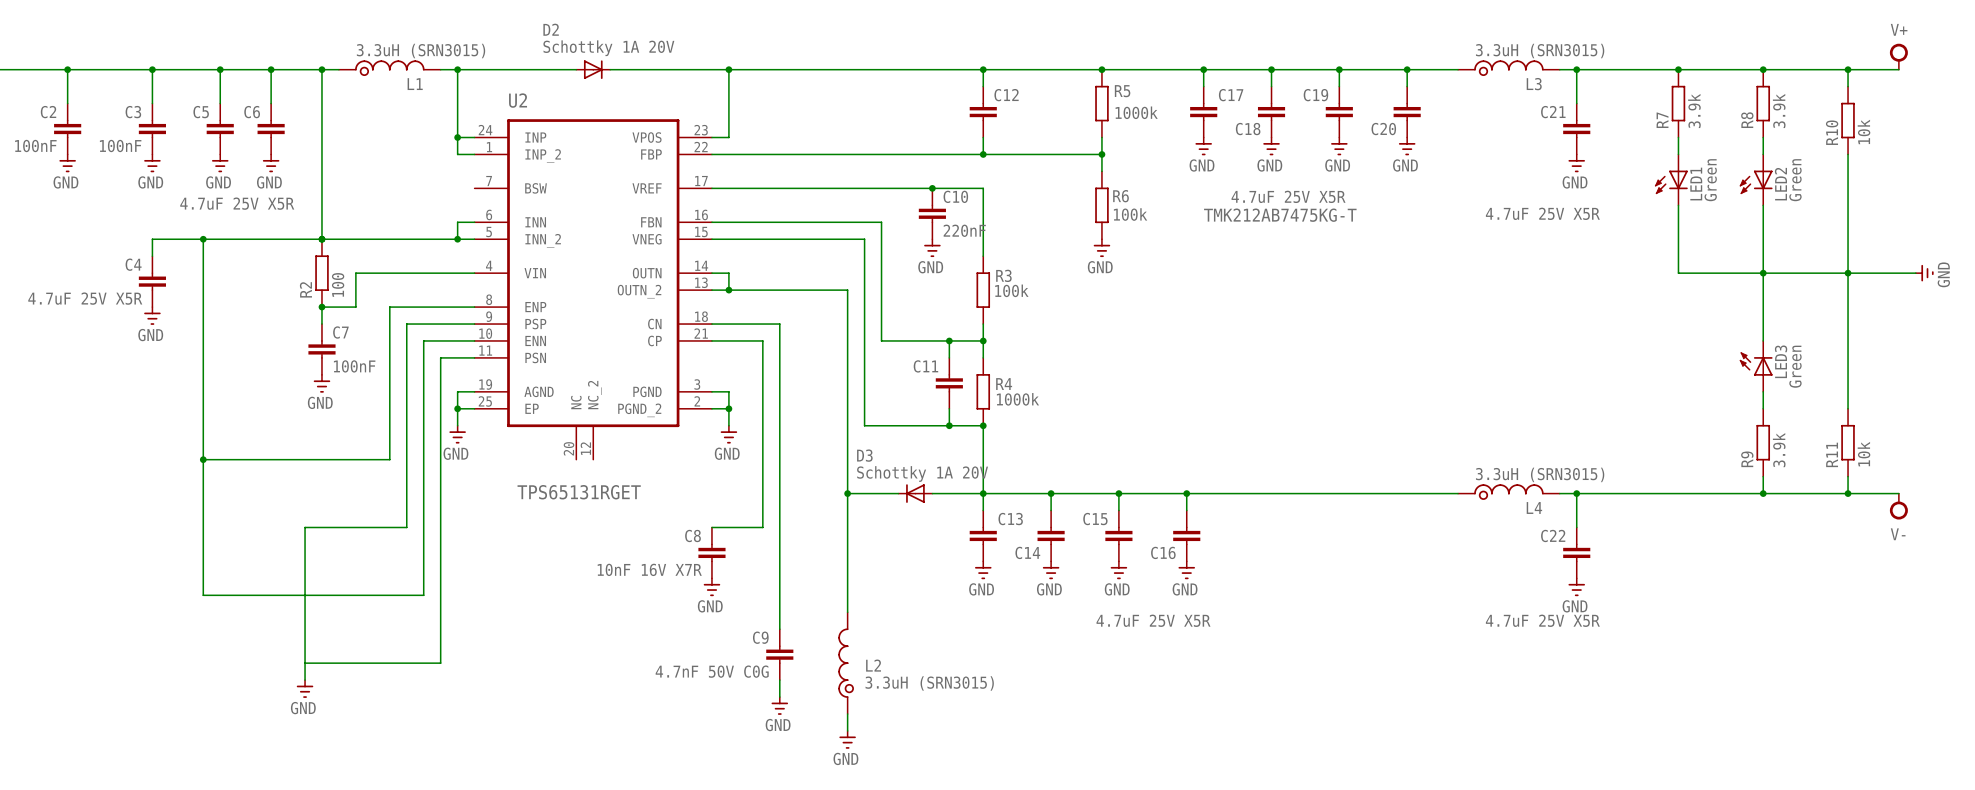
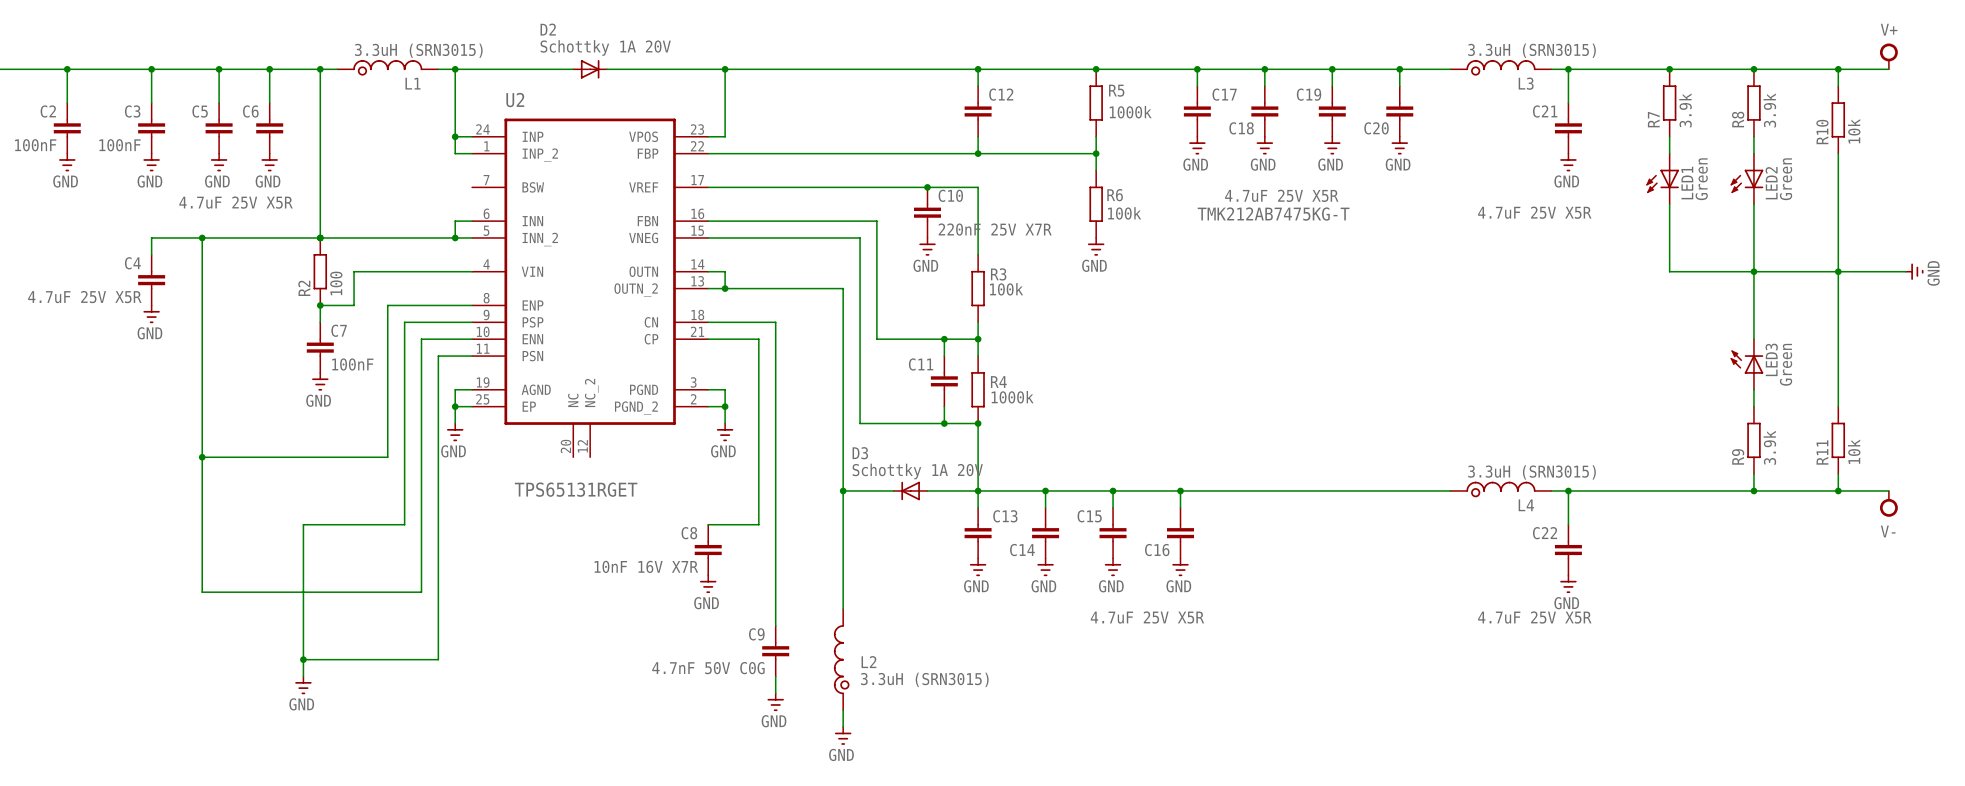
C10 value: 220nF (964, 230) -> 220nF 25V X7R (995, 229)
junction: none -> (303, 659)

